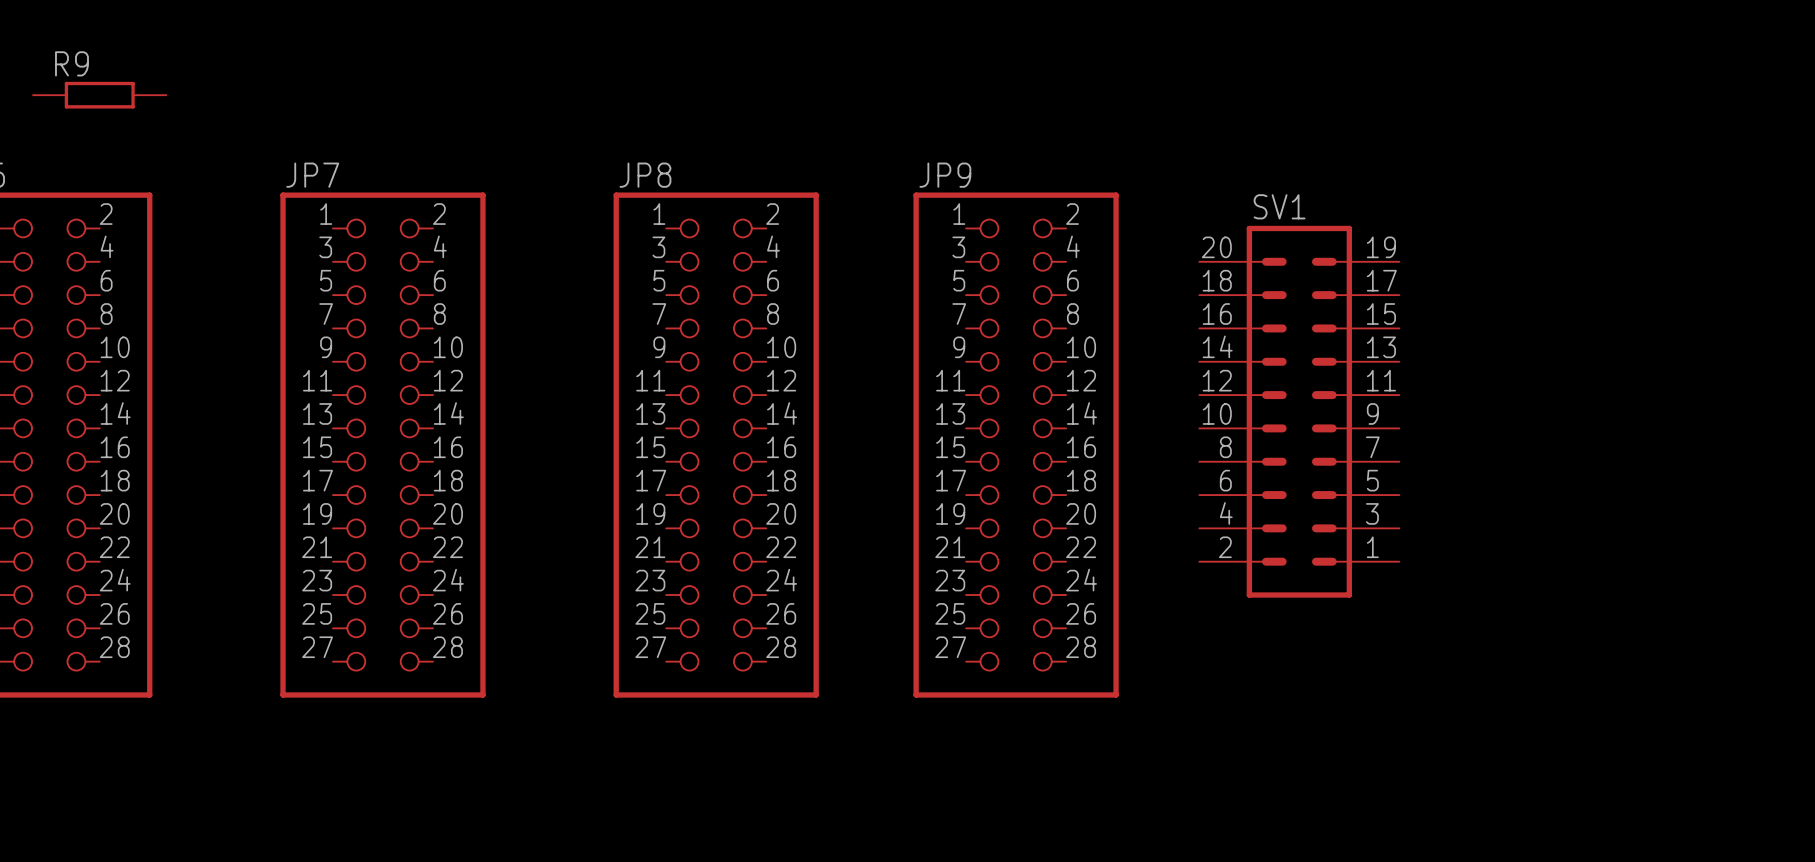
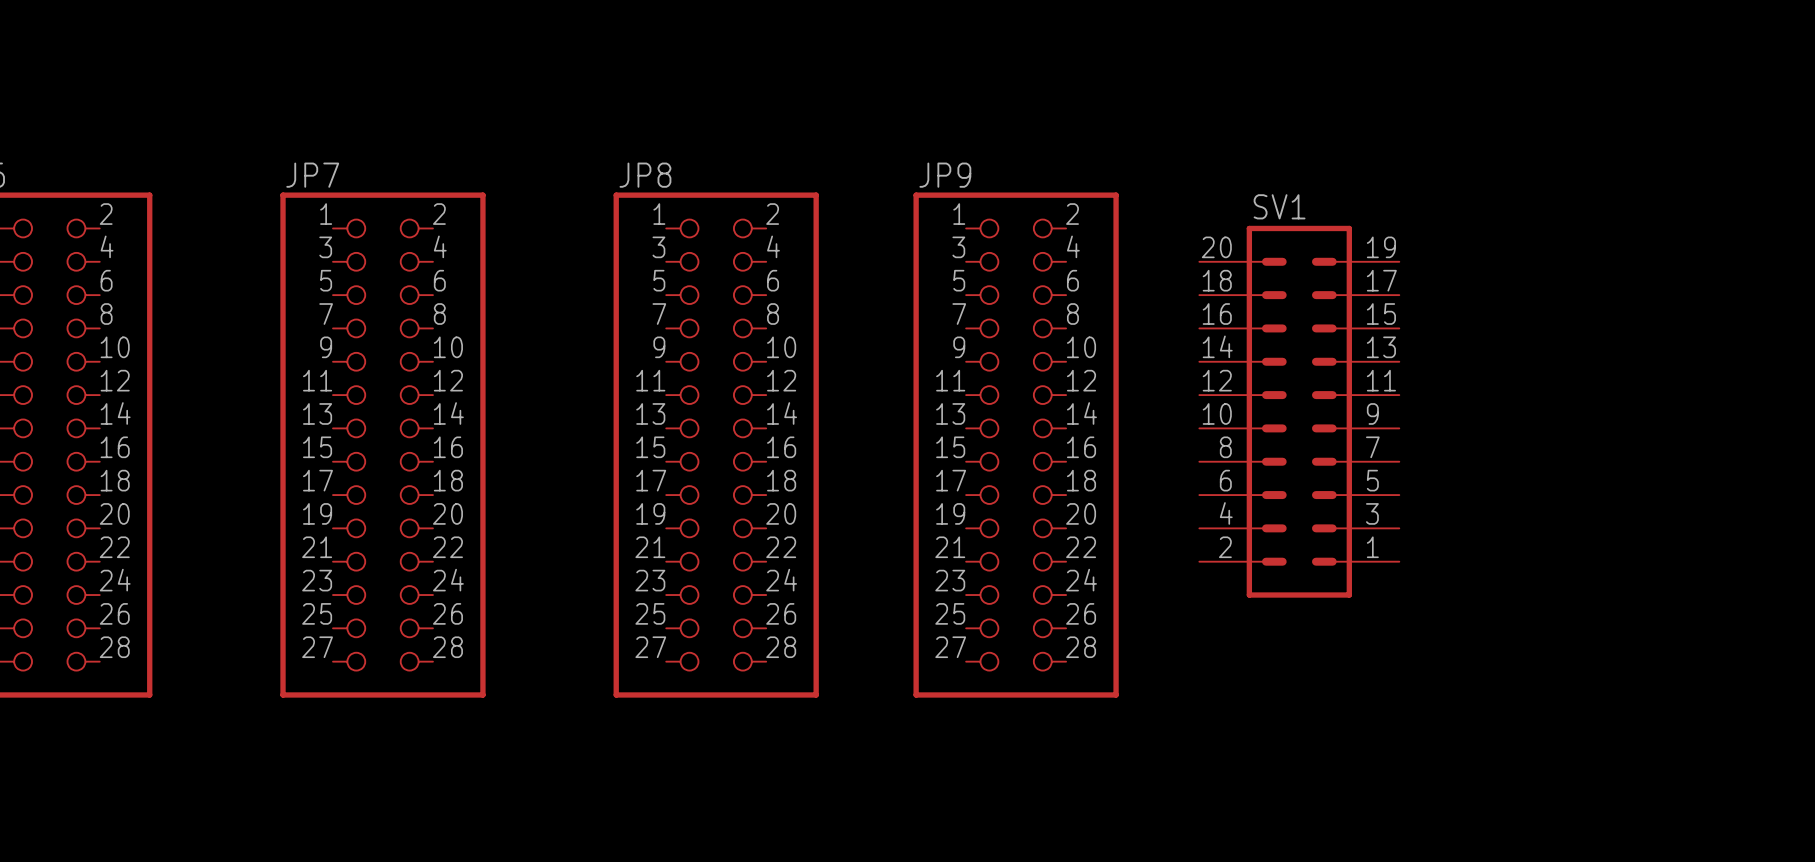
R9: (99, 95) -> none

